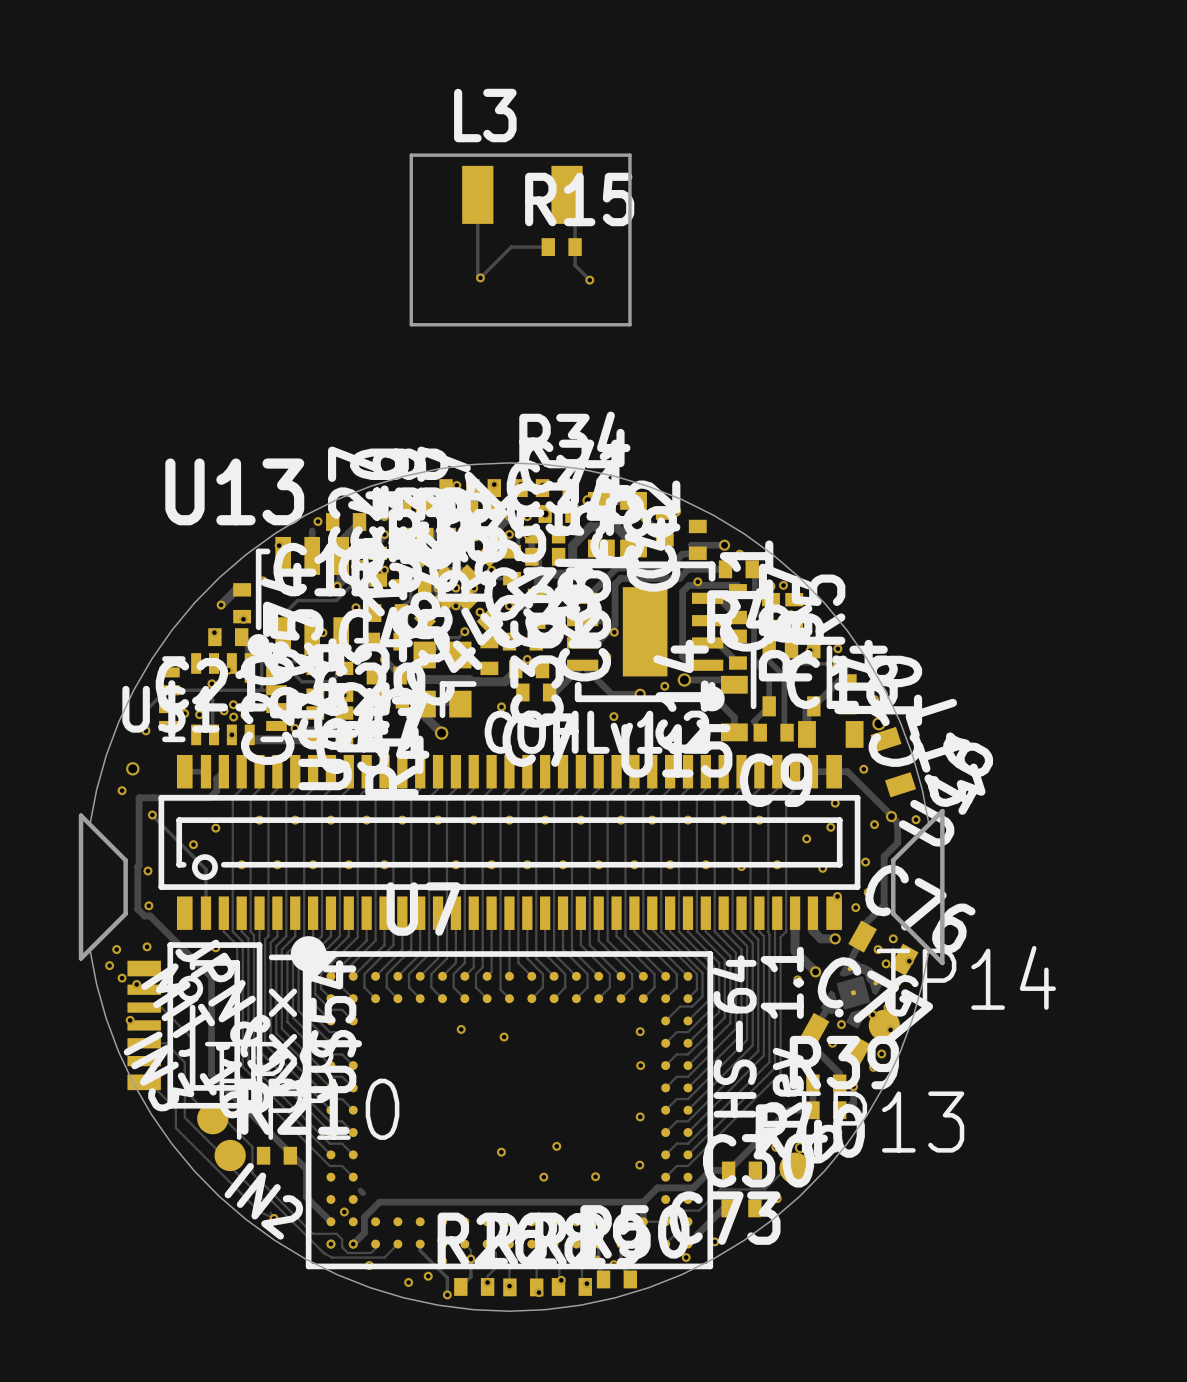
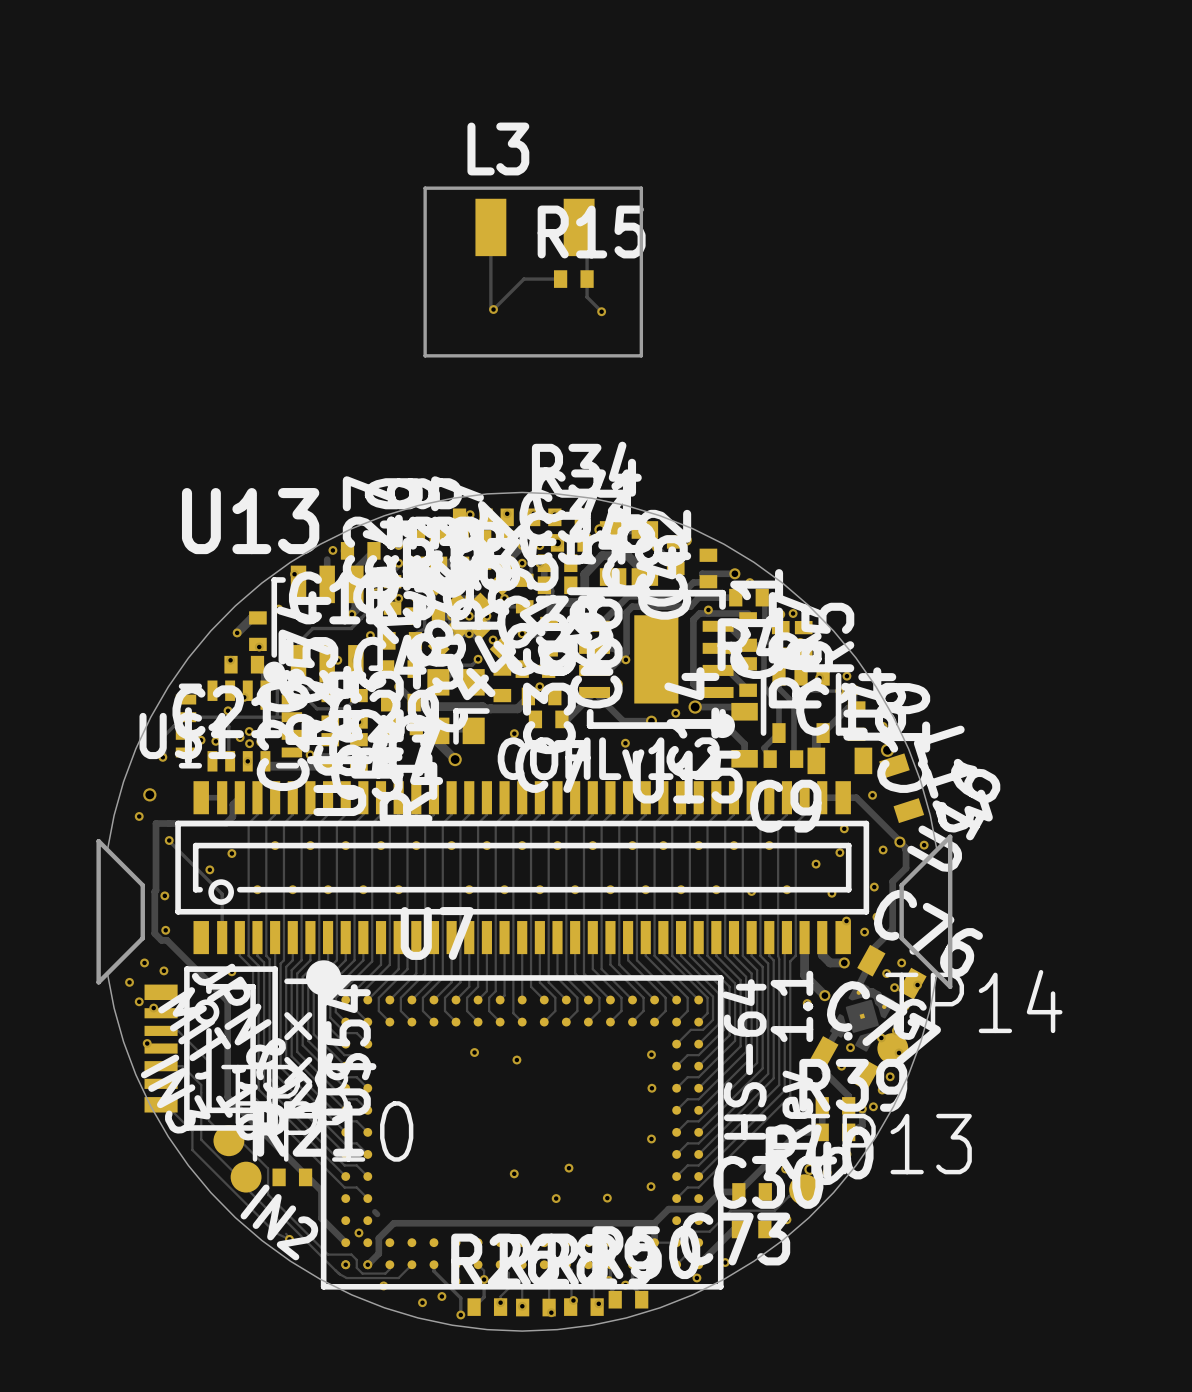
via: none -> (144, 962)
via: (116, 949) -> none
via: none -> (129, 982)
via: (109, 965) -> none
via: none -> (873, 1106)

